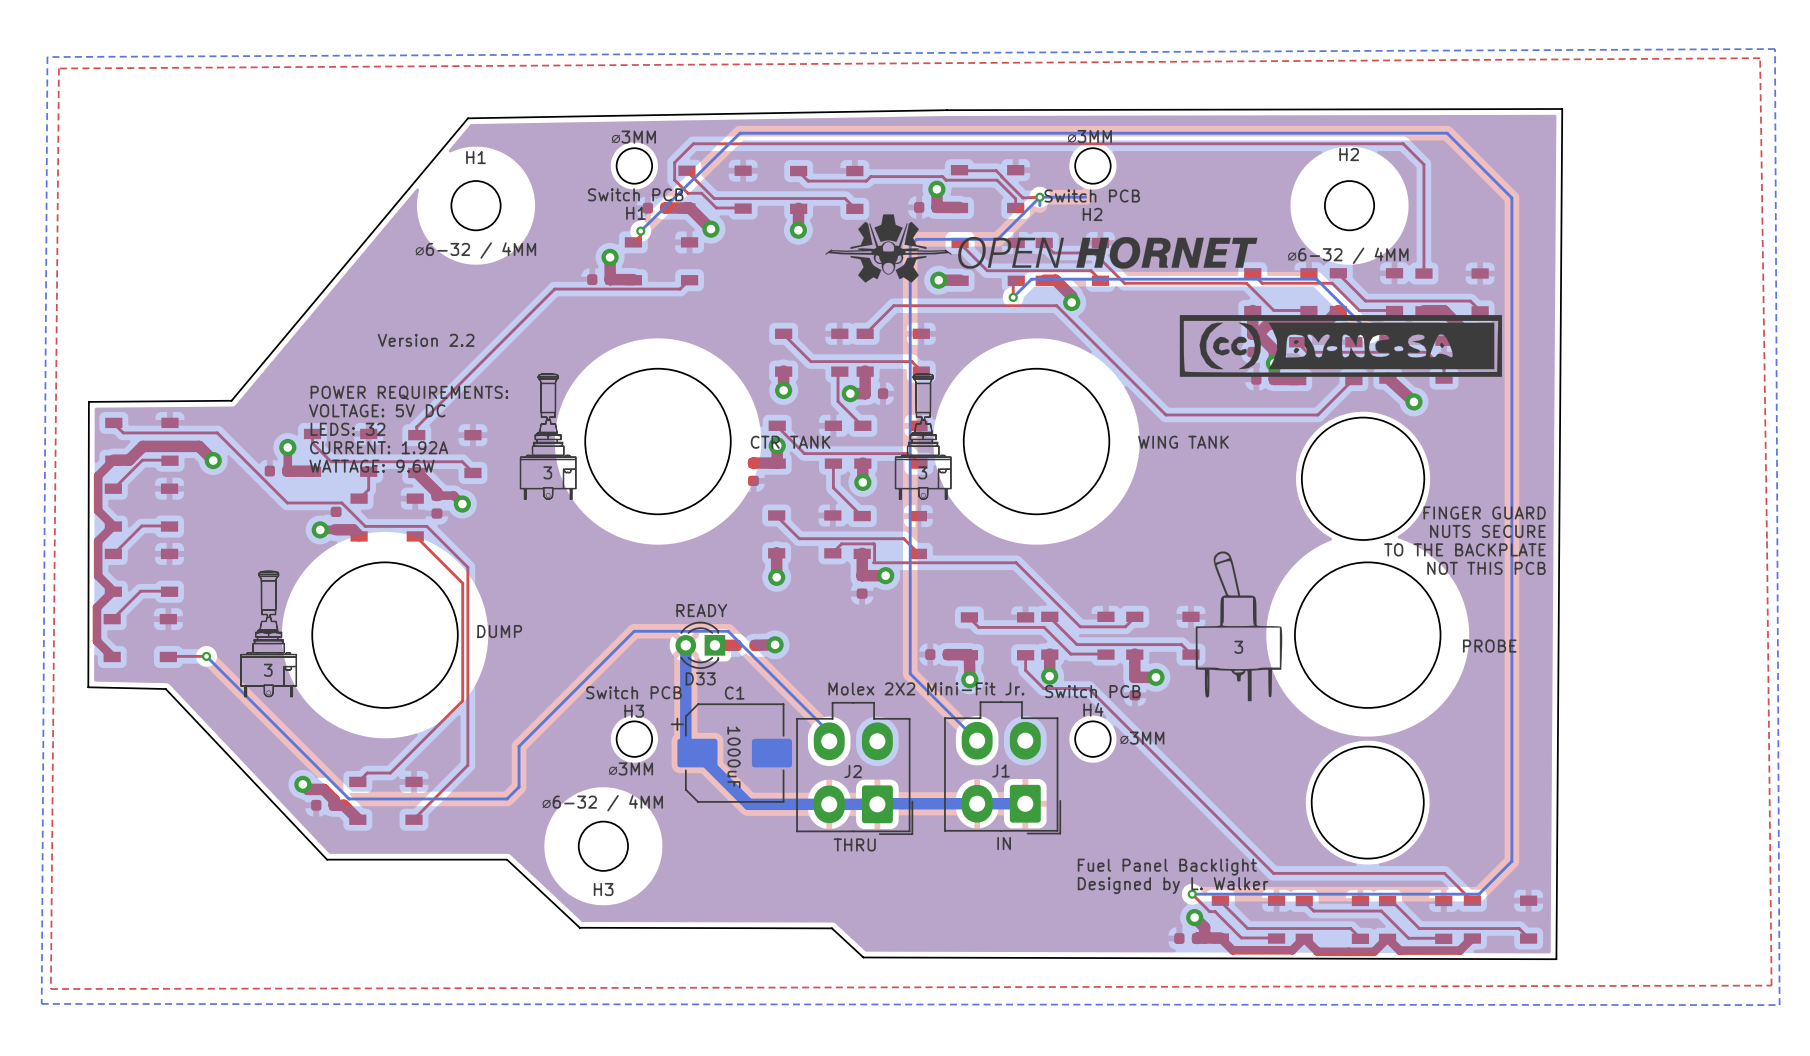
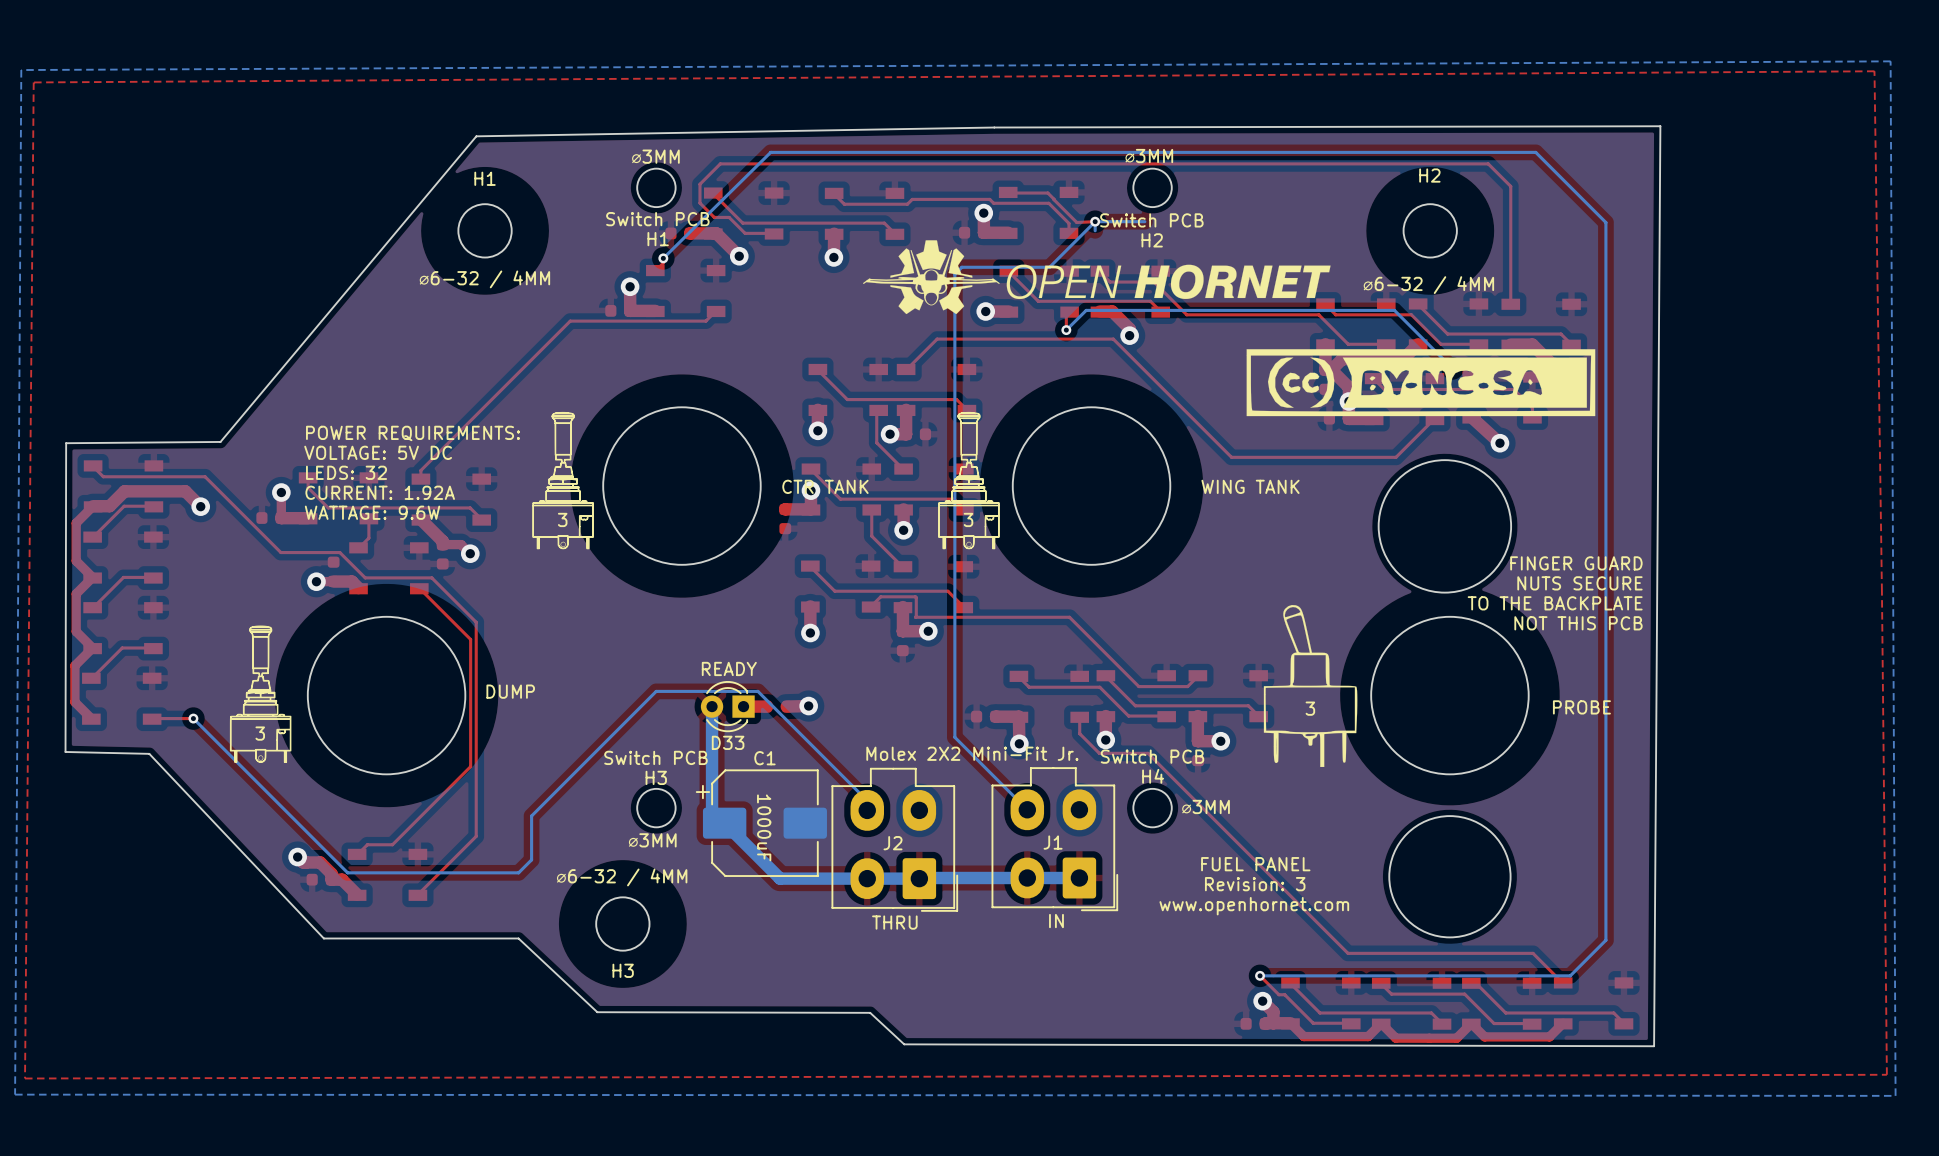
text: Version 2.2 (426, 340) -> none
text: none -> FUEL PANEL (1255, 864)
text: none -> Revision: 3 (1255, 884)
text: none -> www.openhornet.com (1254, 906)
text: Fuel Panel Backlight (1167, 867) -> none
text: Designed by L. Walker (1173, 885) -> none

